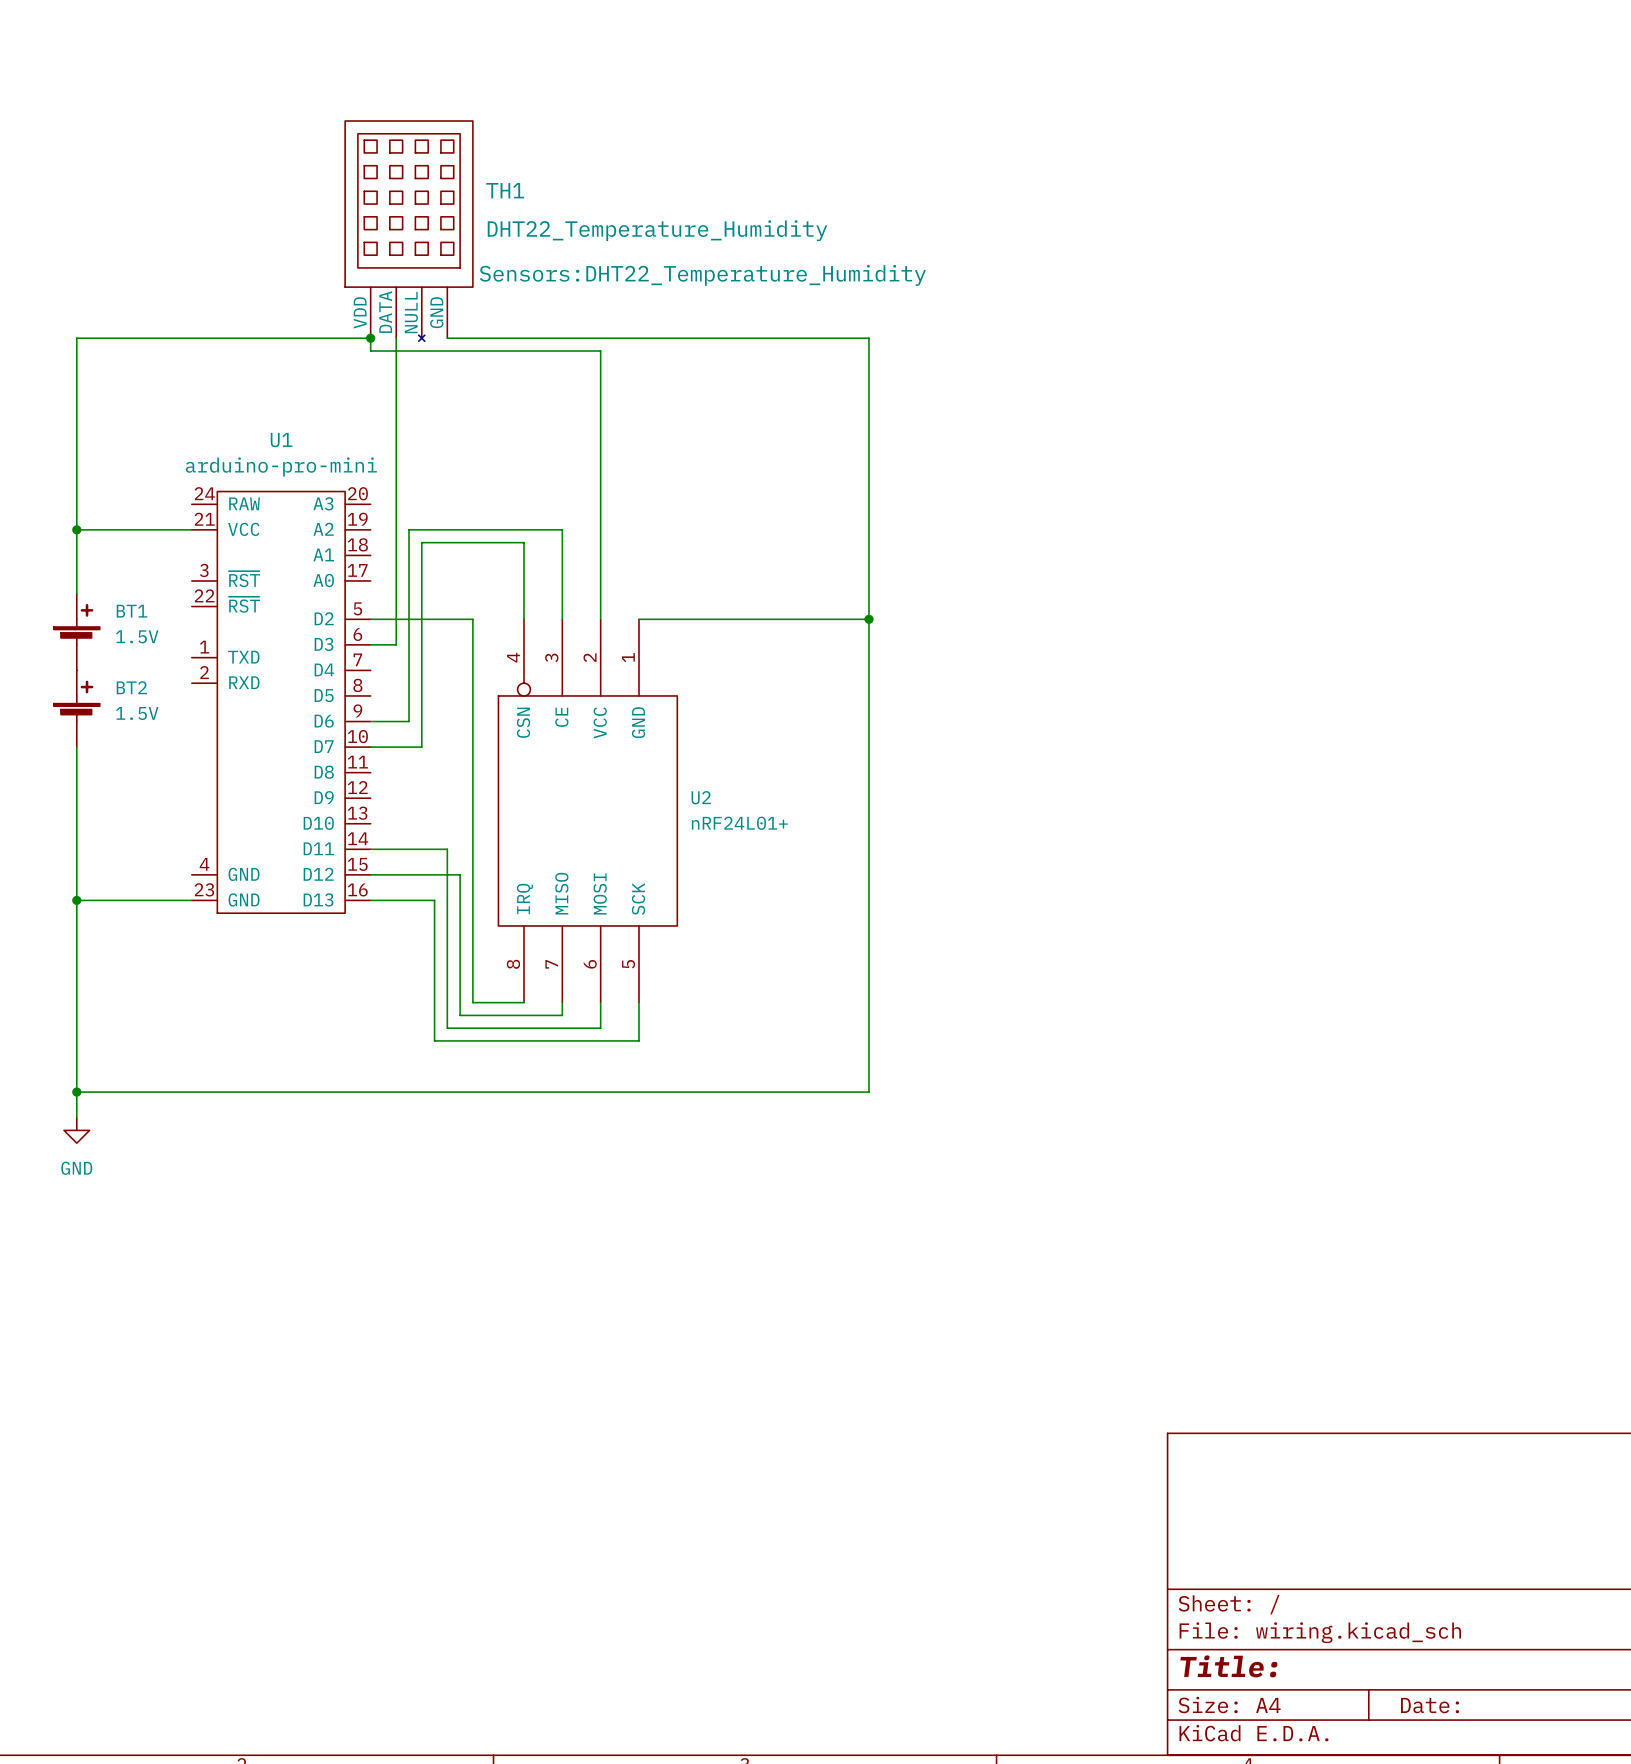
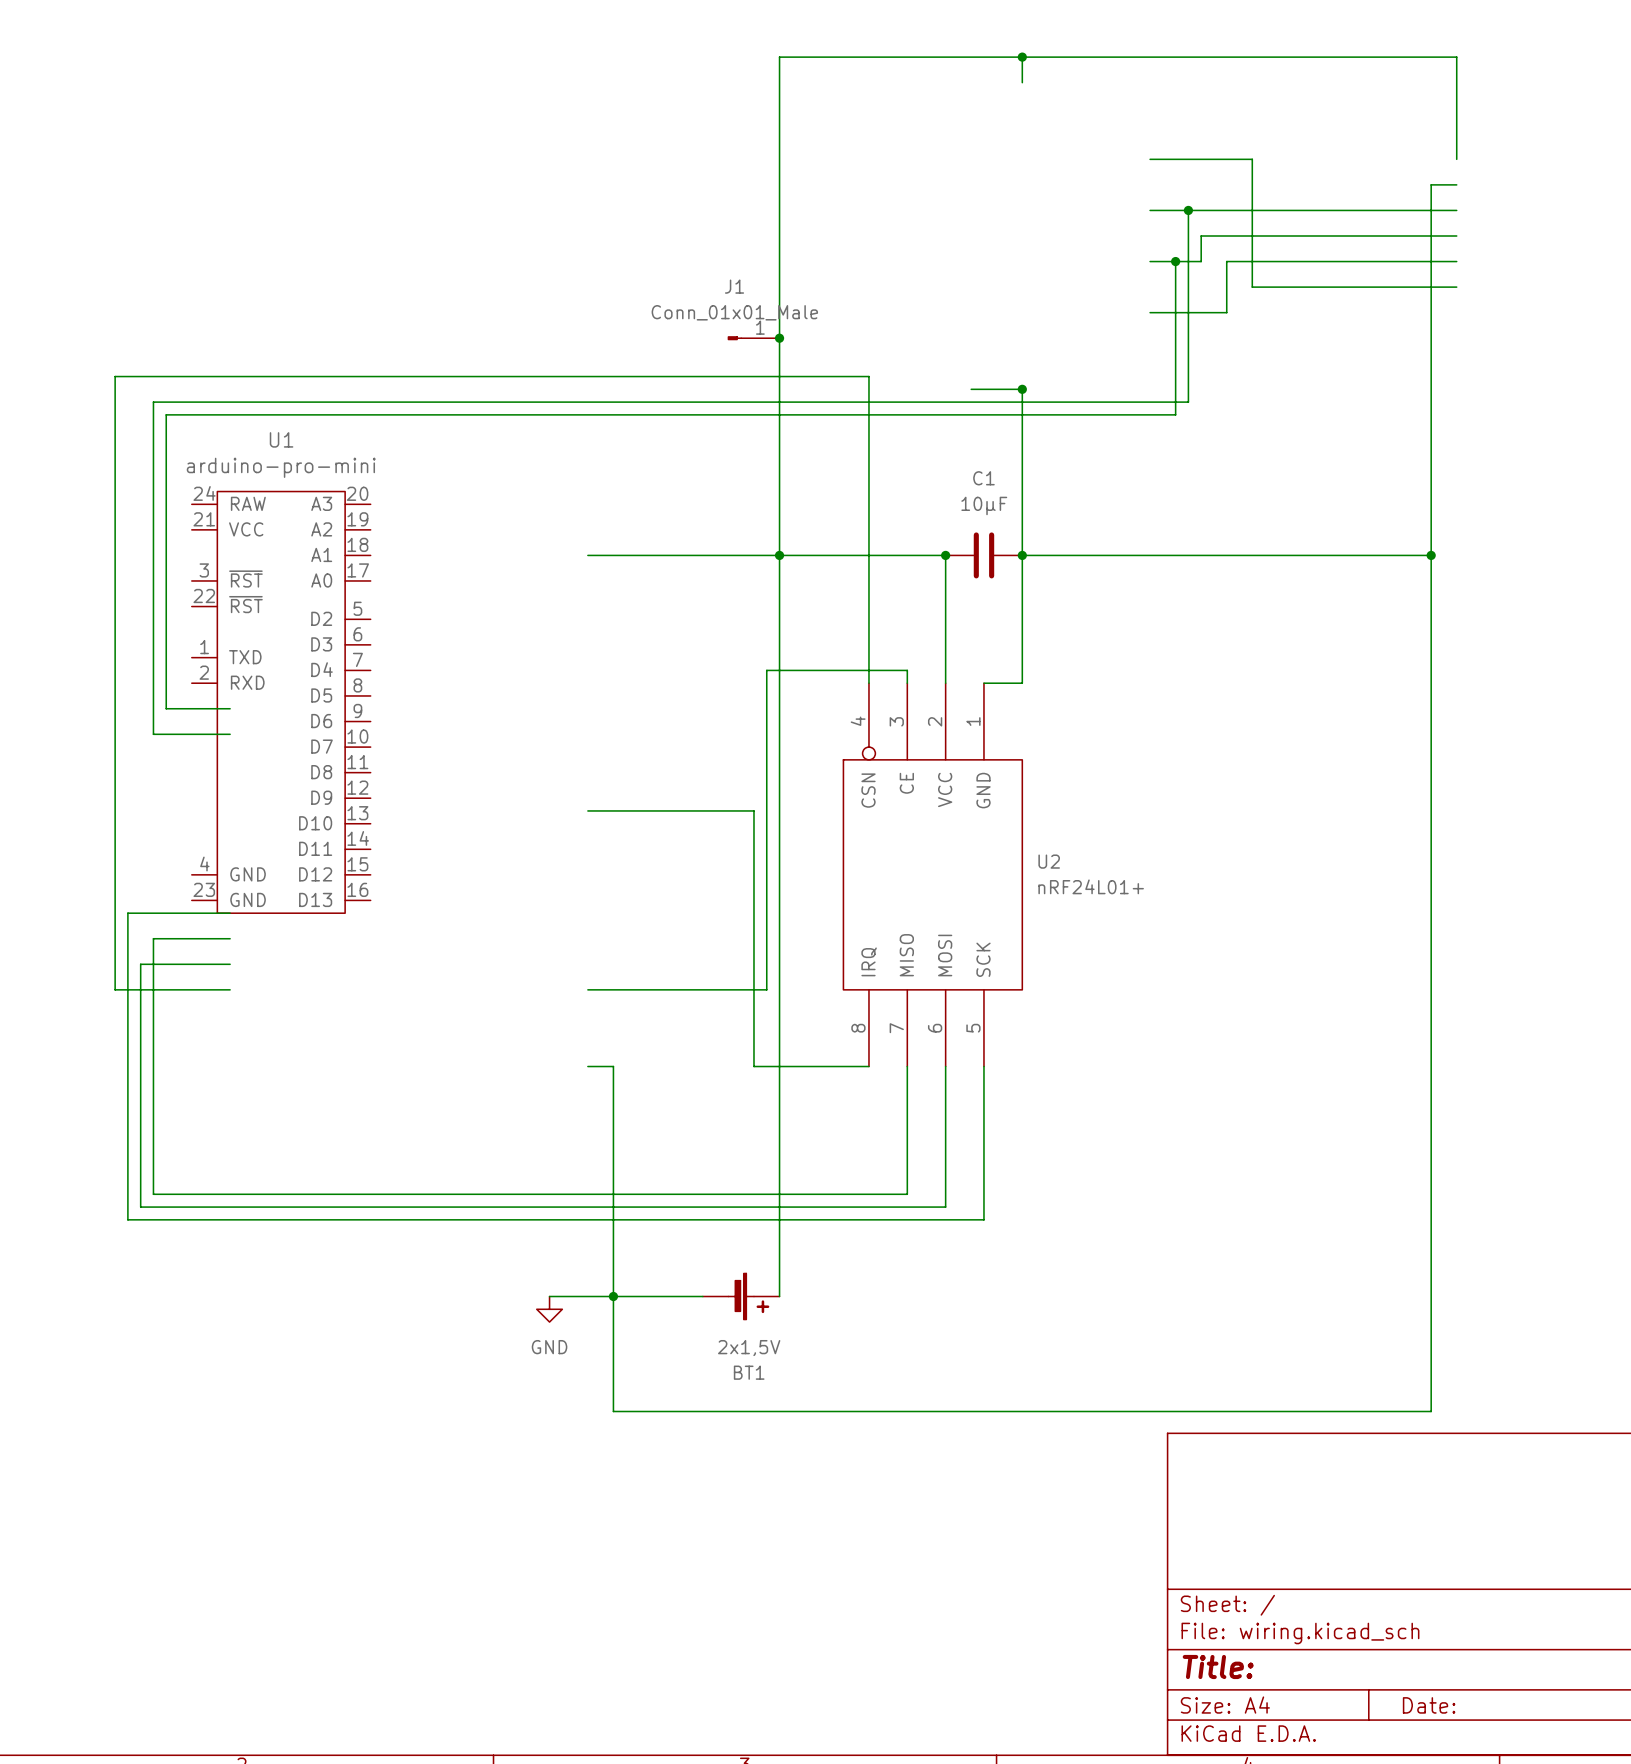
wire: none -> (1022, 57) (1022, 82)
junction: none -> (1022, 57)
wire: none -> (1150, 159) (1252, 159) (1252, 287) (1456, 287)
wire: none -> (1456, 159) (1456, 57) (779, 57) (779, 1296)
wire: none -> (1456, 184) (1431, 184) (1431, 1411) (613, 1411) (613, 1066) (587, 1066)
wire: none -> (1150, 210) (1456, 210)
wire: none -> (1188, 210) (1188, 402) (153, 402) (153, 734) (230, 734)
junction: none -> (1188, 210)
TH1: DHT22_Temperature_Humidity (409, 231) -> none
wire: none -> (1456, 236) (1201, 236) (1201, 261) (1150, 261)
wire: none -> (1175, 261) (1175, 414) (166, 414) (166, 708) (230, 708)
junction: none -> (1175, 261)
wire: none -> (1456, 261) (1226, 261) (1226, 312) (1150, 312)
junction: (370, 338) -> none
wire: (396, 338) (396, 644) (370, 644) -> none
wire: (447, 338) (868, 338) (868, 376) -> (230, 989) (115, 989) (115, 376) (868, 376)
J1: none -> Conn_01x01_Male (753, 338)
junction: none -> (779, 338)
wire: none -> (971, 389) (1022, 389) (1022, 683) (983, 683)
junction: none -> (1022, 389)
wire: (76, 529) (191, 529) -> none
junction: (76, 529) -> none
wire: none -> (587, 555) (945, 555) (945, 683)
junction: none -> (779, 555)
junction: none -> (945, 555)
C1: none -> 10µF (983, 555)
wire: none -> (1022, 555) (1431, 555)
junction: none -> (1022, 555)
junction: none -> (1431, 555)
wire: (76, 593) (76, 338) (370, 338) (370, 350) (600, 350) (600, 619) -> none
BT1 name position: BT1 (131, 611) -> BT1 (749, 1372)
wire: (370, 619) (472, 619) (472, 1002) (524, 1002) -> none
wire: (524, 619) (524, 542) (421, 542) (421, 747) (370, 747) -> none
wire: (562, 619) (562, 529) (409, 529) (409, 721) (370, 721) -> none
wire: (638, 619) (868, 619) -> none
junction: (868, 619) -> none
BT1 rotation: 0° (76, 624) -> 90° clockwise (748, 1296)
BT1 position: (76, 632) -> (741, 1296)
BT1 value: 1.5V (137, 636) -> 2x1,5V (749, 1348)
wire: (868, 683) (868, 1092) (76, 1092) -> none
wire: none -> (907, 683) (907, 670) (766, 670) (766, 989) (587, 989)
BT2: 1.5V (76, 708) -> none
wire: (76, 747) (76, 1117) -> none
wire: none -> (587, 810) (753, 810) (753, 1066) (868, 1066)
U2 position: (587, 810) -> (932, 874)
wire: (370, 849) (447, 849) (447, 1028) (600, 1028) (600, 1002) -> none
wire: (370, 874) (460, 874) (460, 1015) (562, 1015) (562, 1002) -> none
wire: (76, 900) (191, 900) -> none
junction: (76, 900) -> none
wire: (370, 900) (434, 900) (434, 1040) (638, 1040) (638, 1002) -> none
wire: none -> (230, 913) (127, 913) (127, 1219) (983, 1219) (983, 1066)
wire: none -> (230, 938) (153, 938) (153, 1194) (907, 1194) (907, 1066)
wire: none -> (230, 964) (140, 964) (140, 1207) (945, 1207) (945, 1066)
junction: (76, 1092) -> none
power symbol: GND (76, 1130) -> none
wire: none -> (549, 1296) (702, 1296)
junction: none -> (613, 1296)
power symbol: none -> GND (549, 1309)

